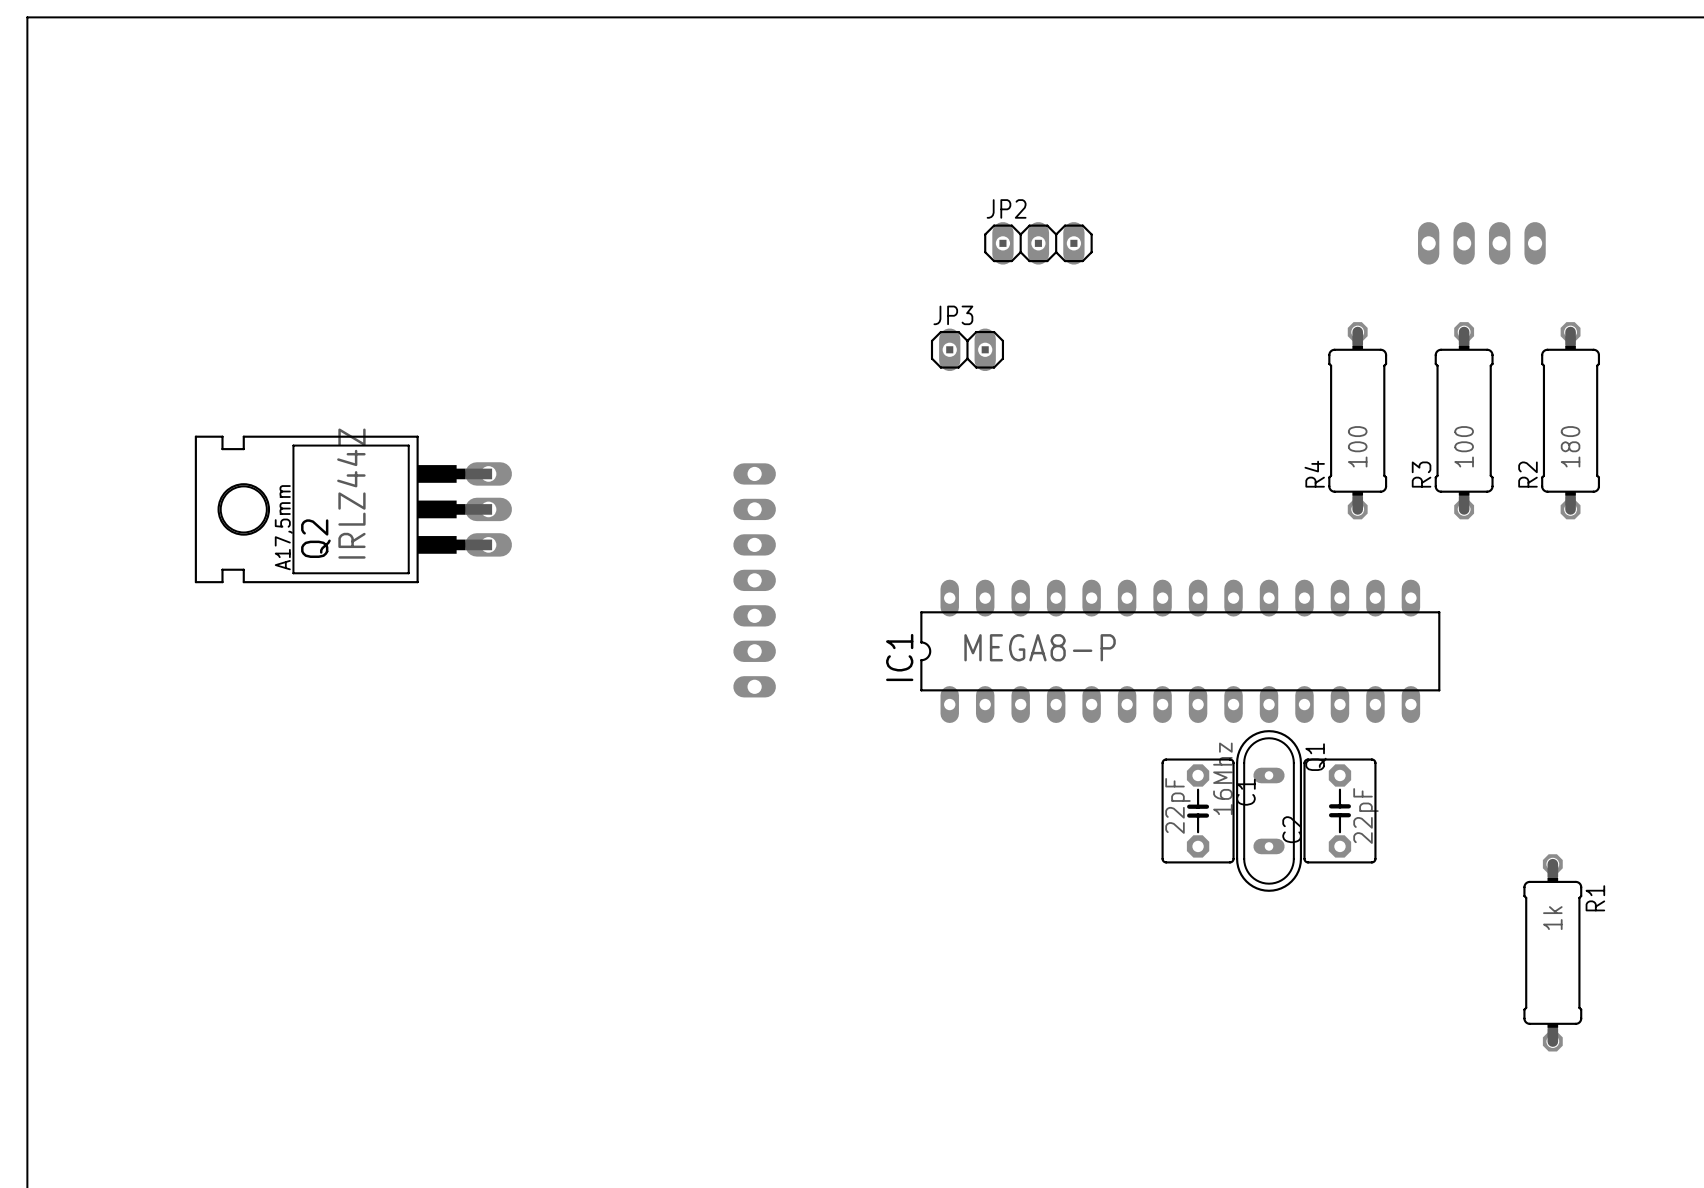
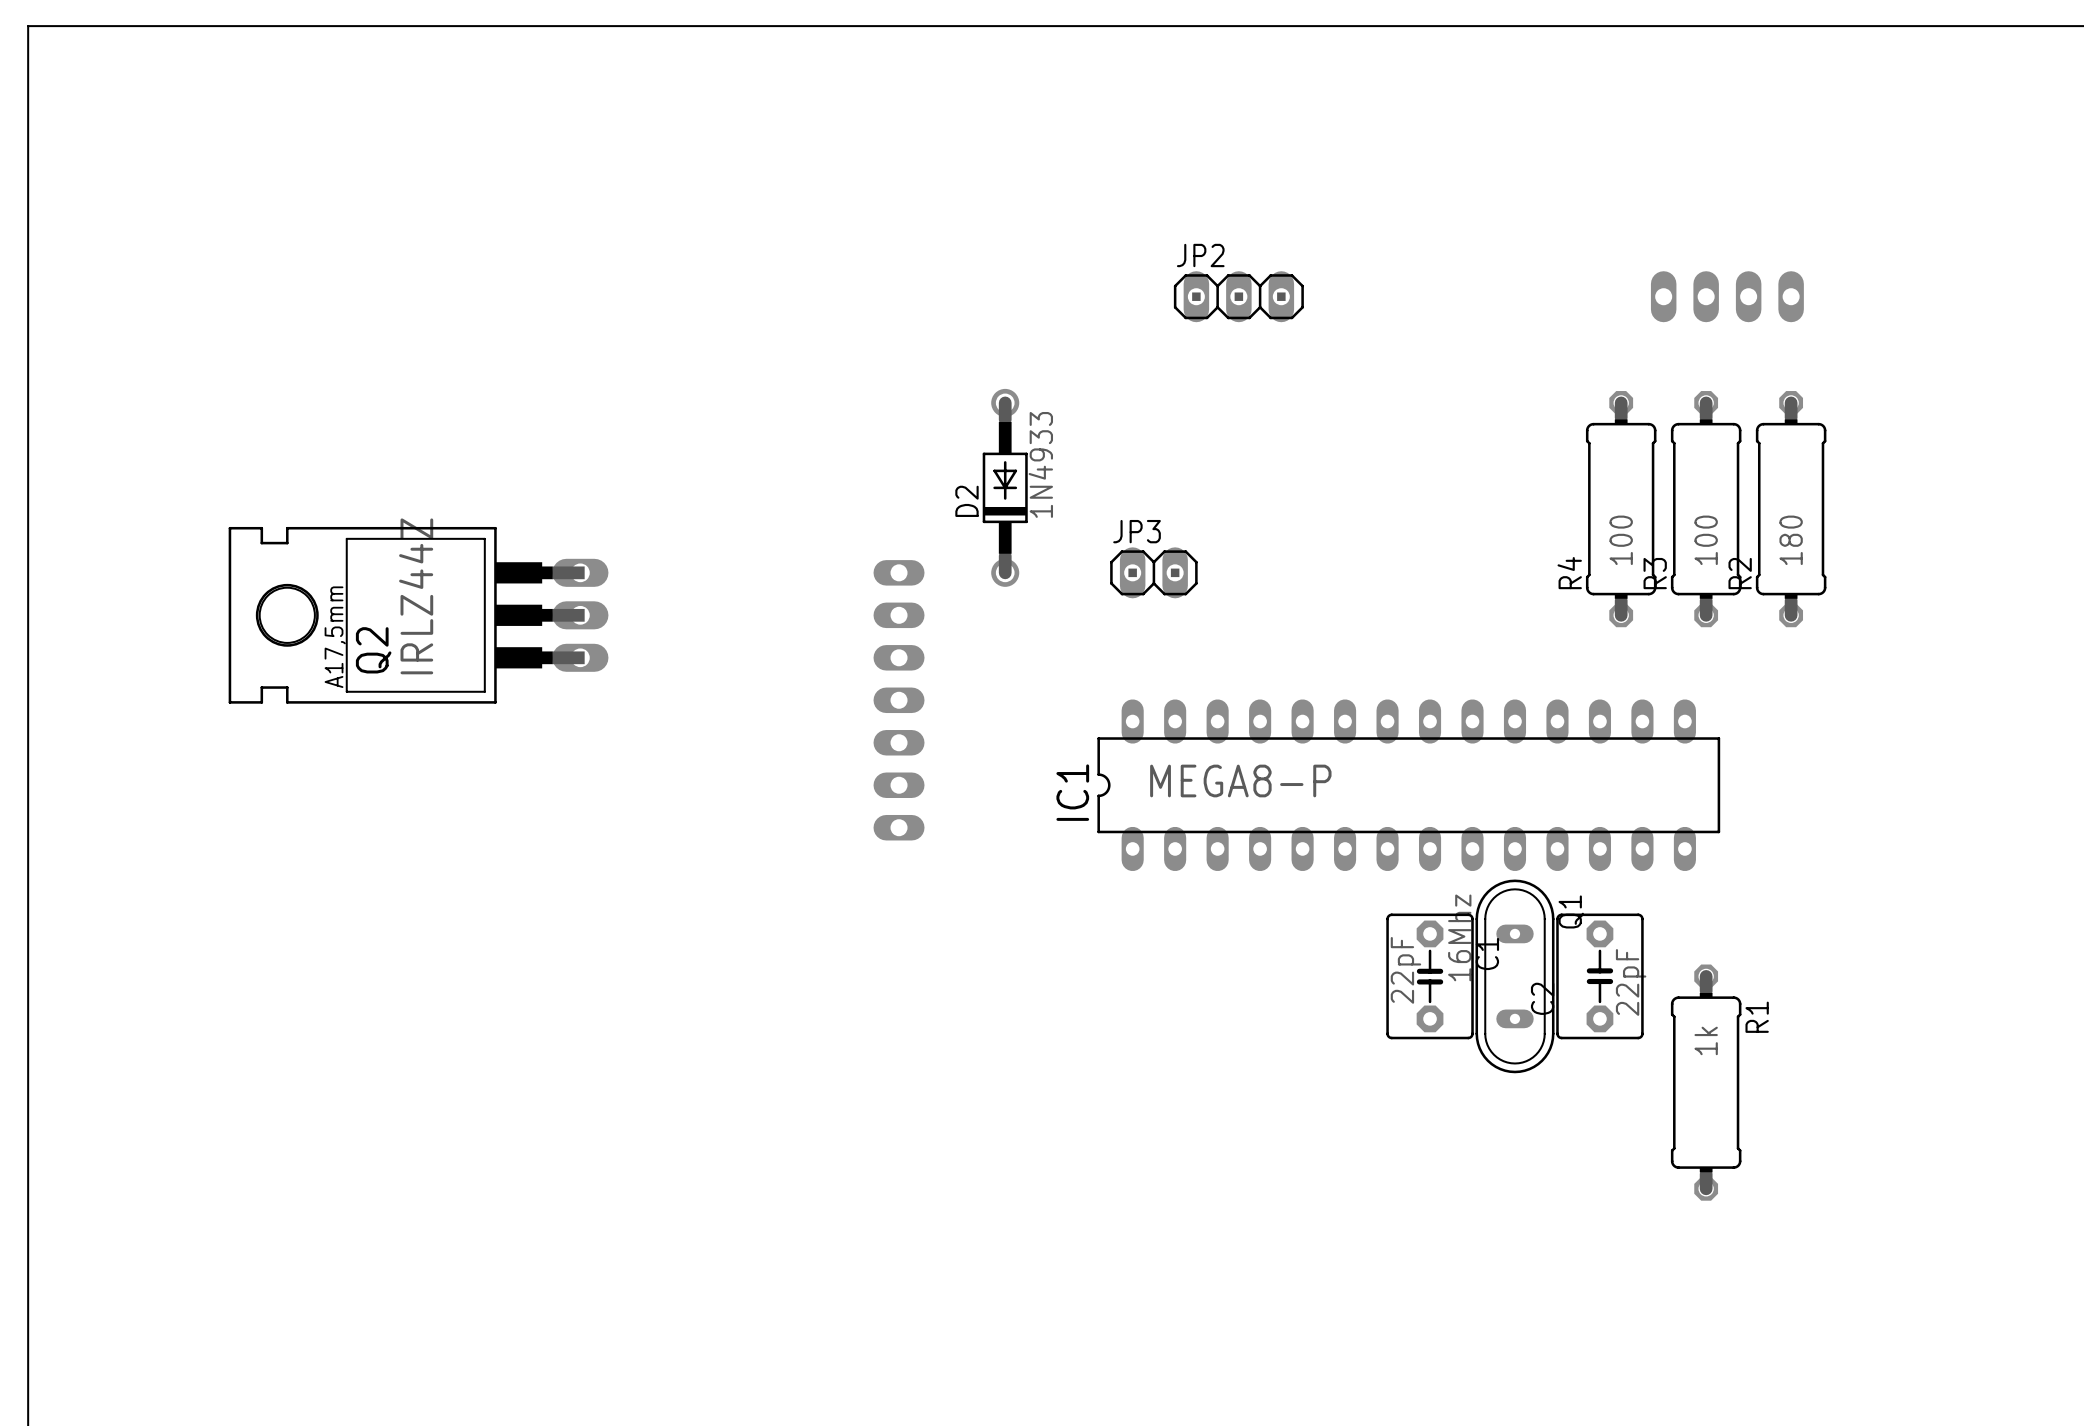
part position: (1481, 243) -> (1727, 296)
JP3 position: (967, 349) -> (1153, 572)
D2: none -> 1N4933 (1005, 487)
R3 position: (1464, 420) -> (1706, 509)
R2 position: (1570, 420) -> (1791, 509)
R1 position: (1552, 952) -> (1706, 1082)

